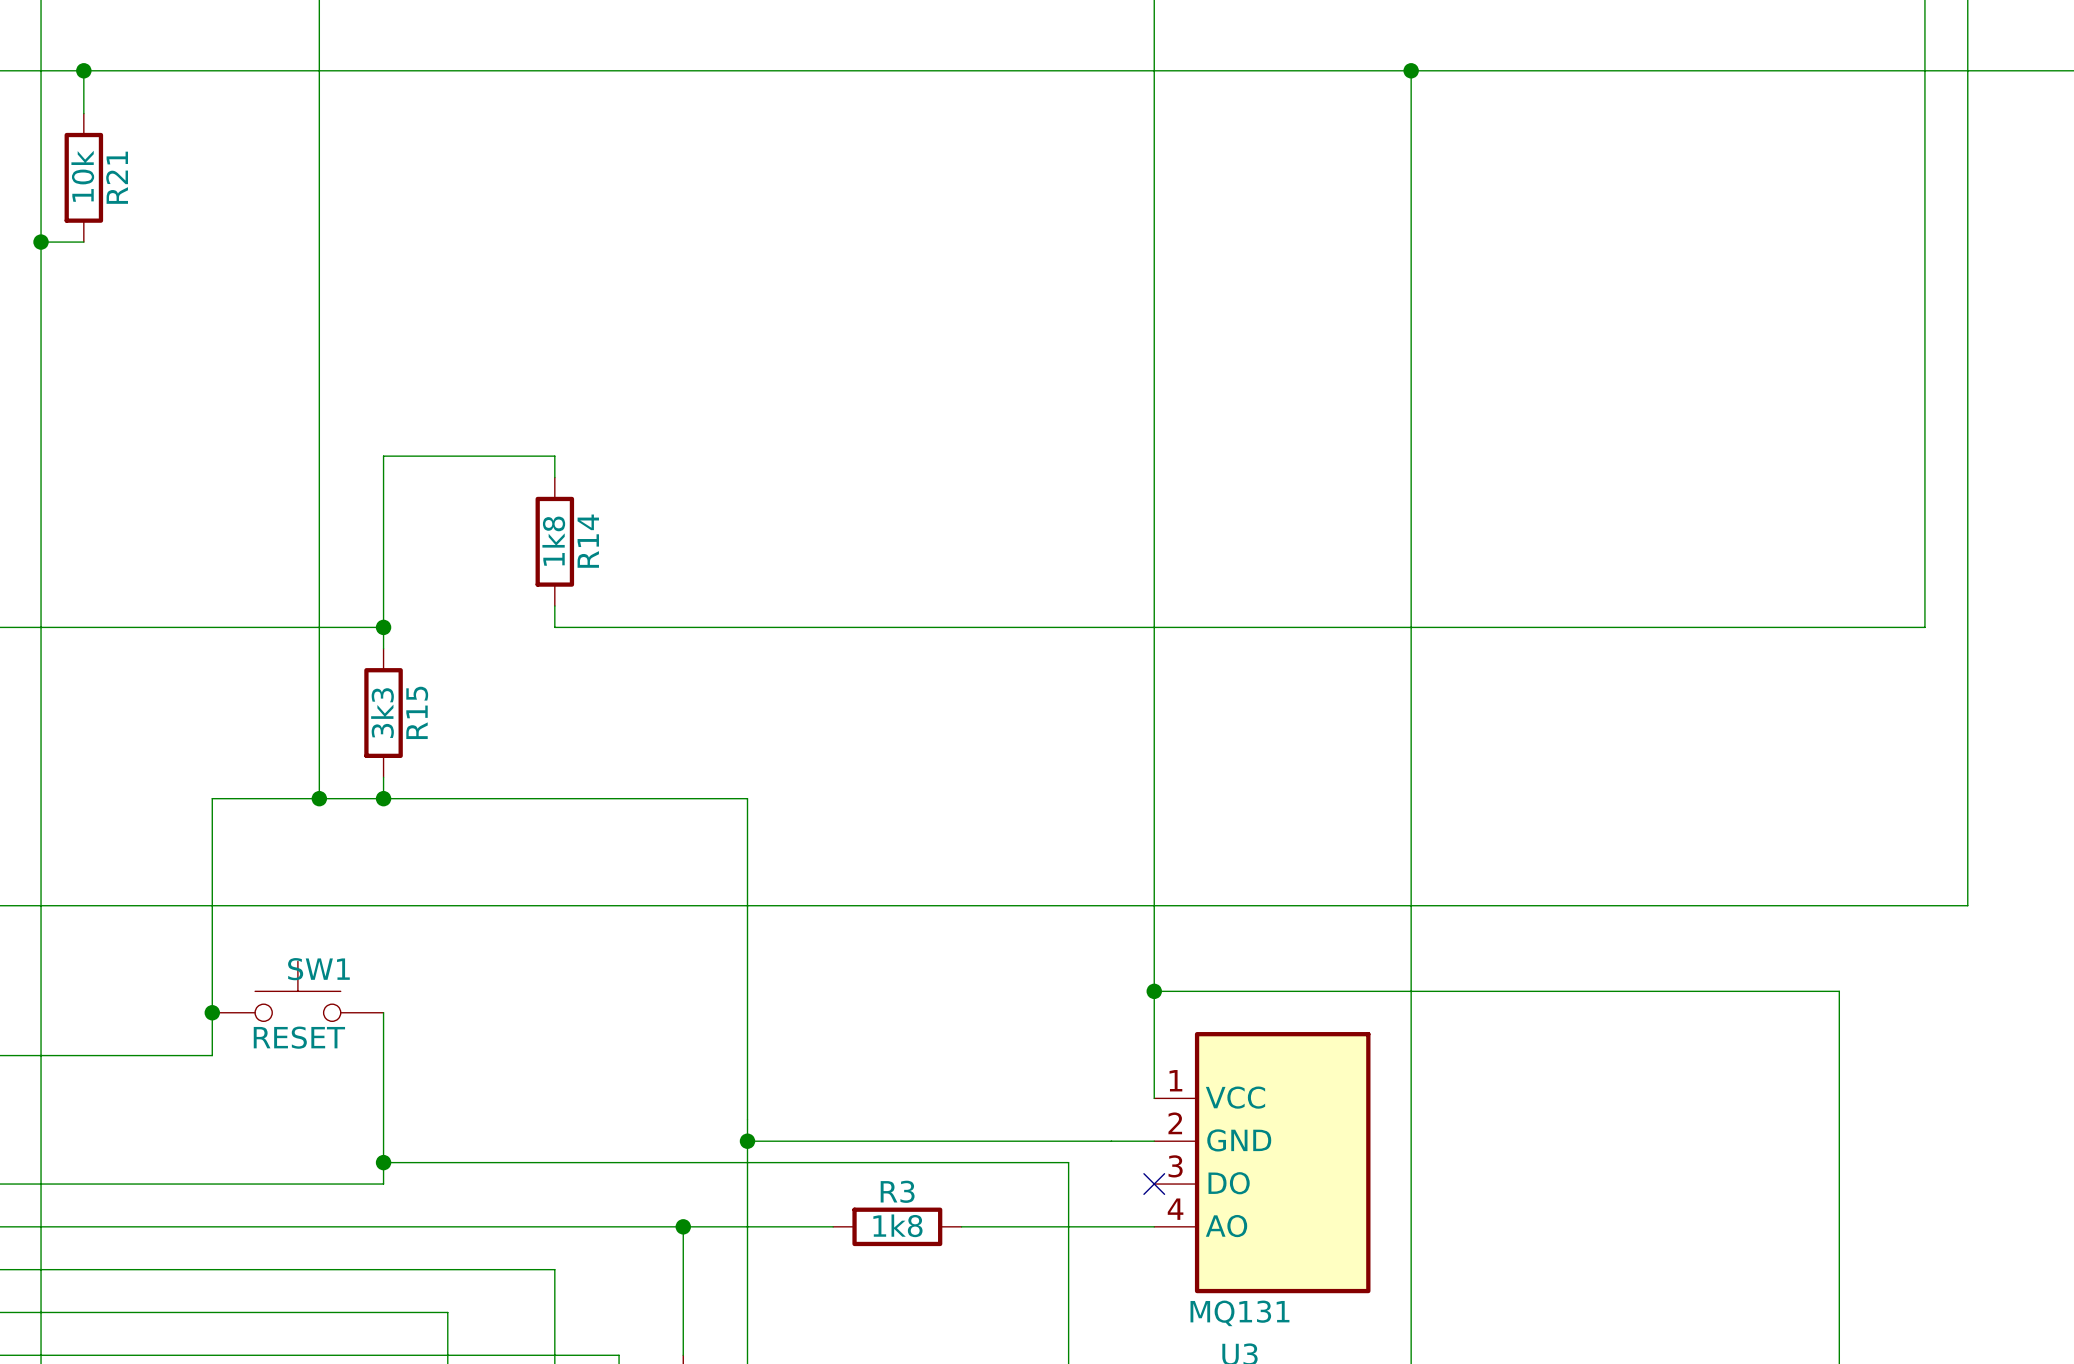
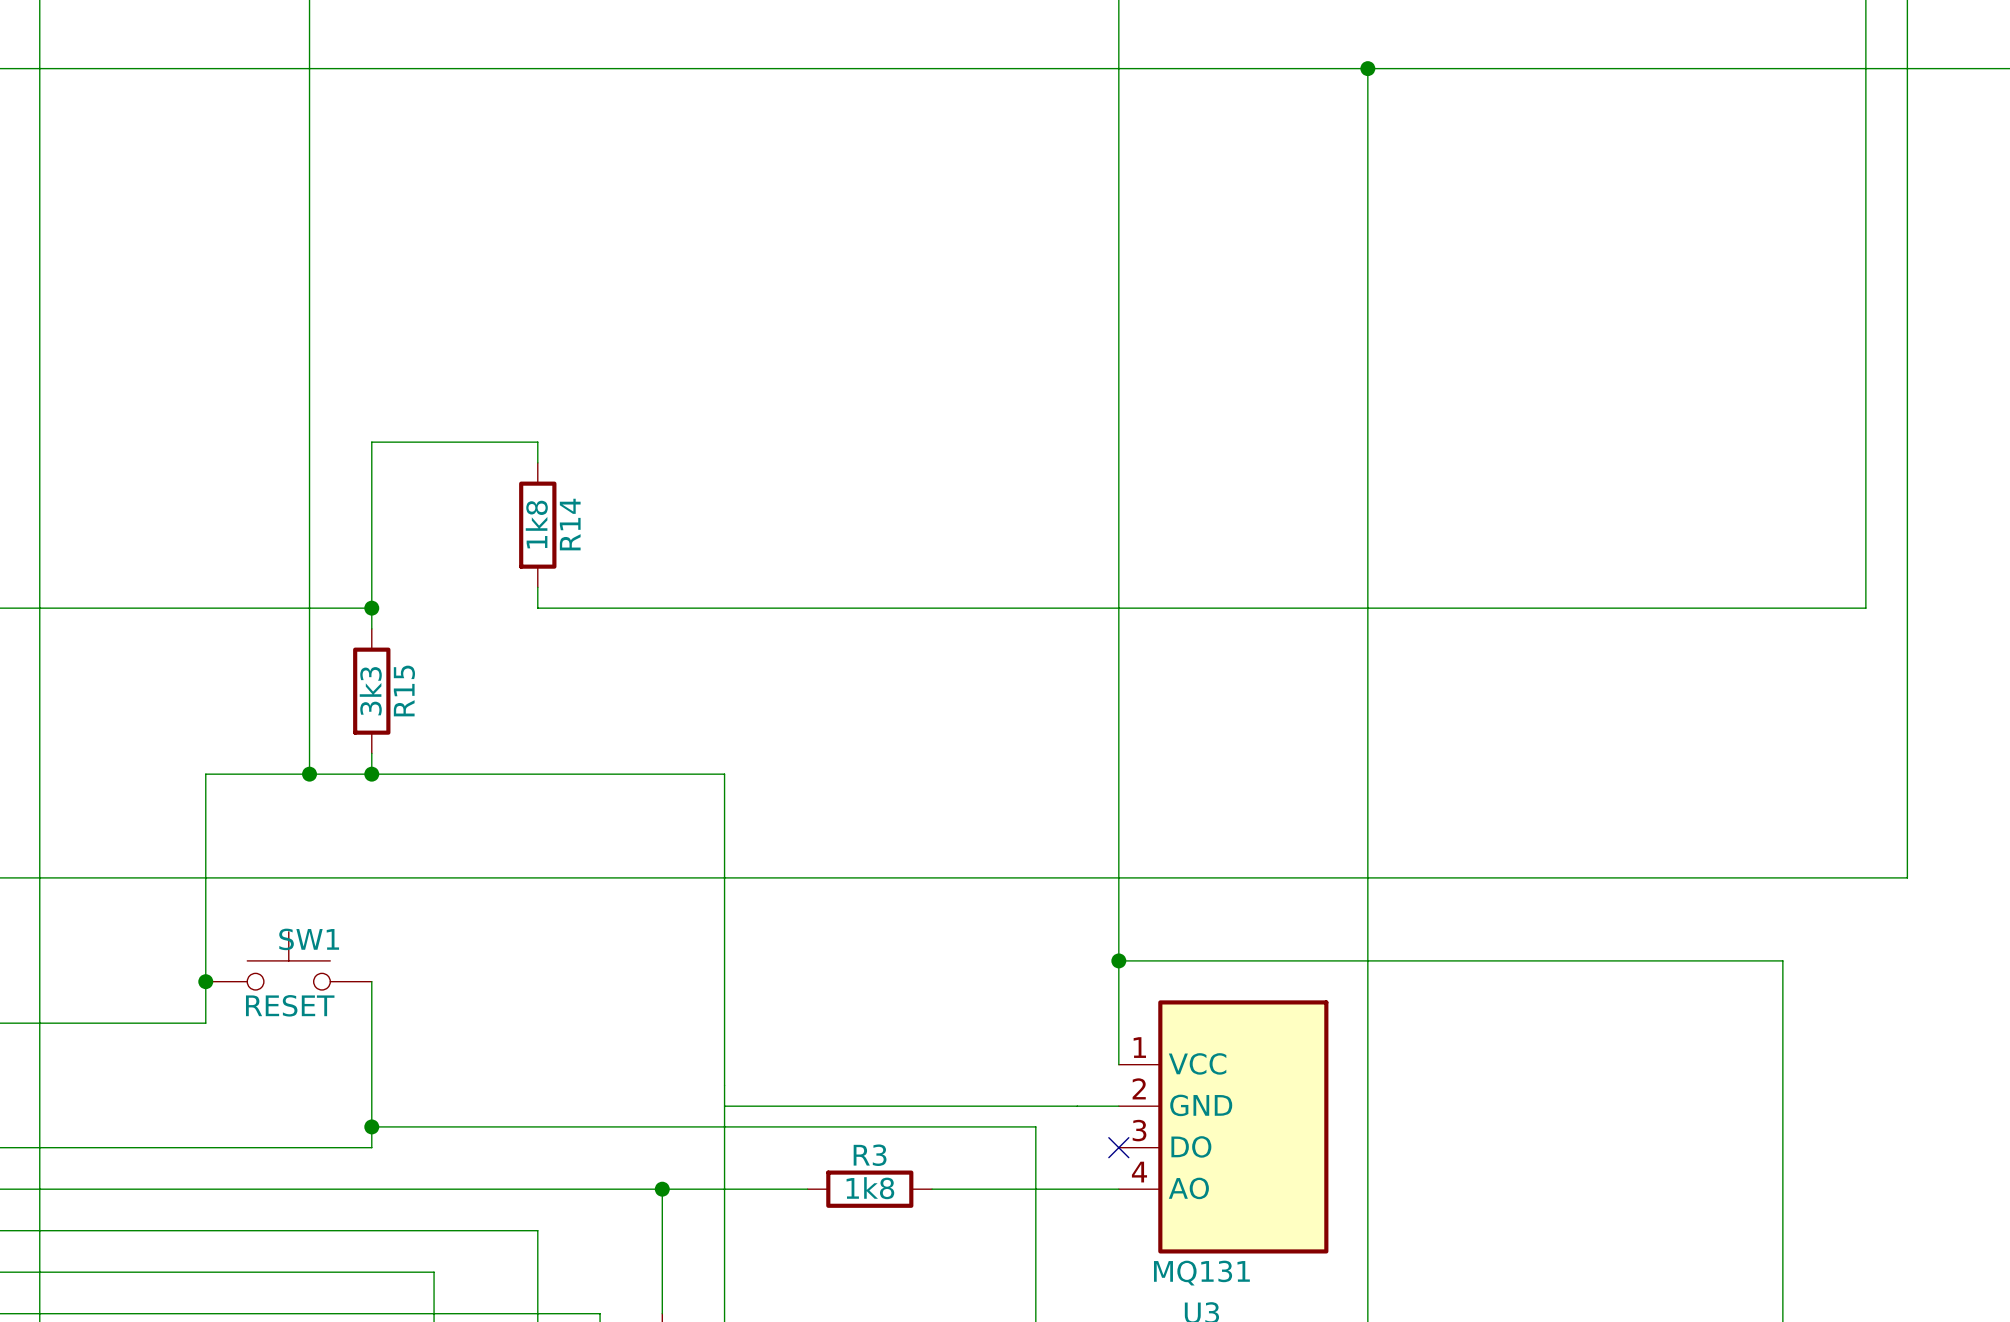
wire: (83, 70) (83, 113) -> none
junction: (83, 70) -> none
R21: 10k (83, 177) -> none
wire: (41, 242) (83, 242) -> none
junction: (41, 242) -> none
junction: (747, 1141) -> none

